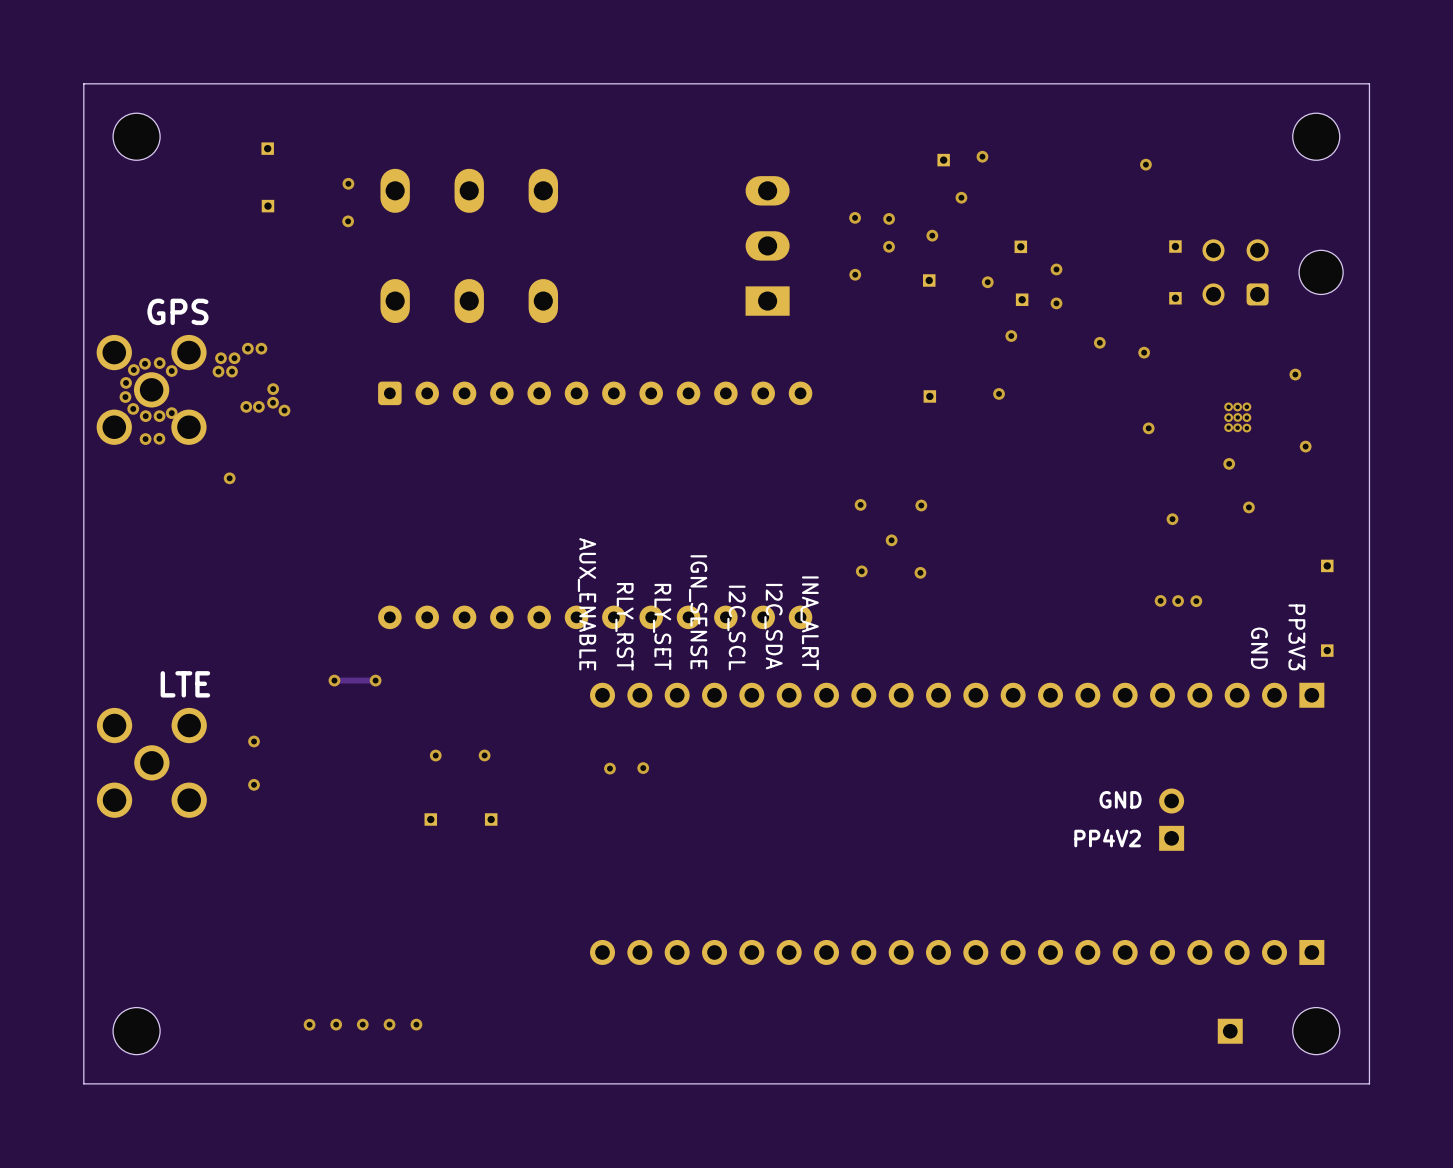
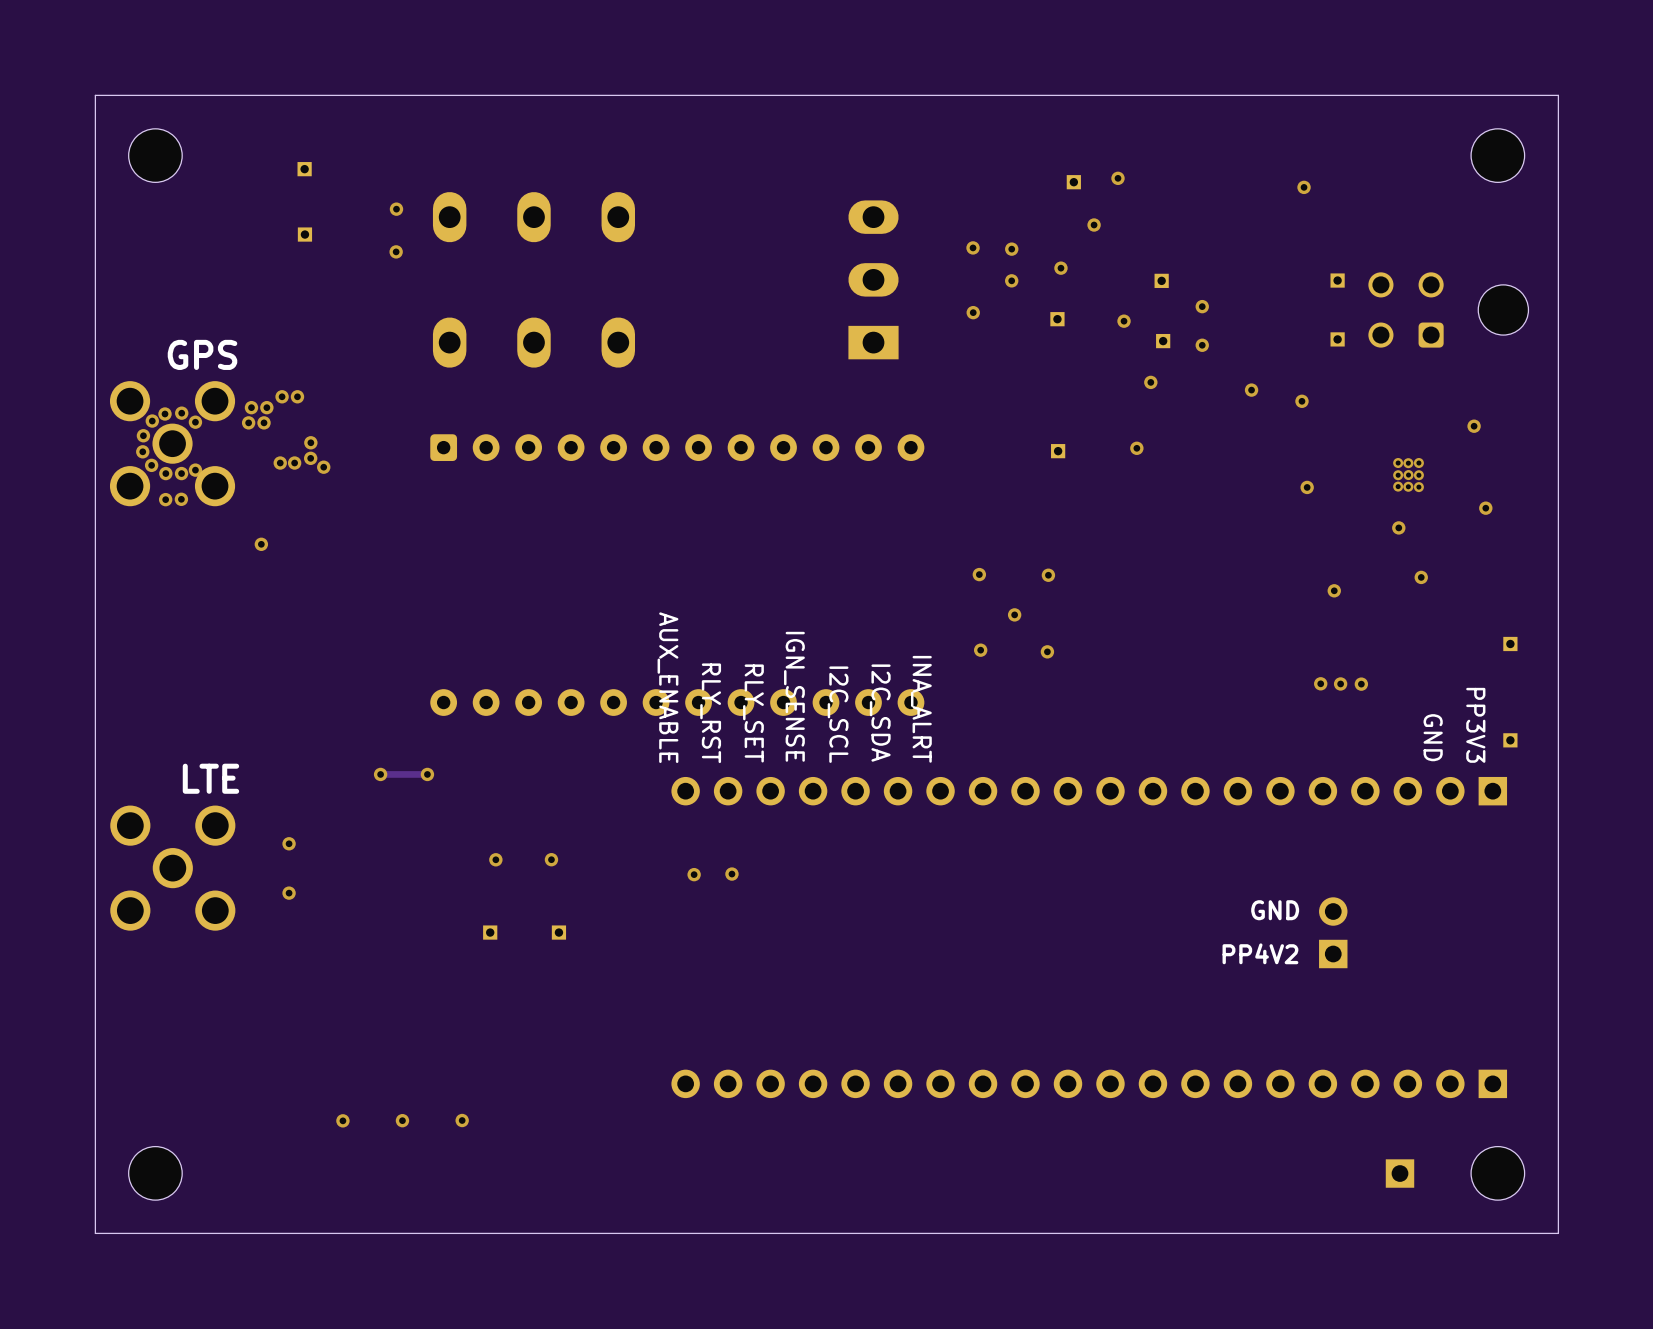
via: none -> (342, 1120)
via: none -> (402, 1120)
via: none -> (462, 1120)
via: (309, 1024) -> none
via: (336, 1024) -> none
via: (362, 1024) -> none
via: (389, 1024) -> none
via: (416, 1024) -> none

